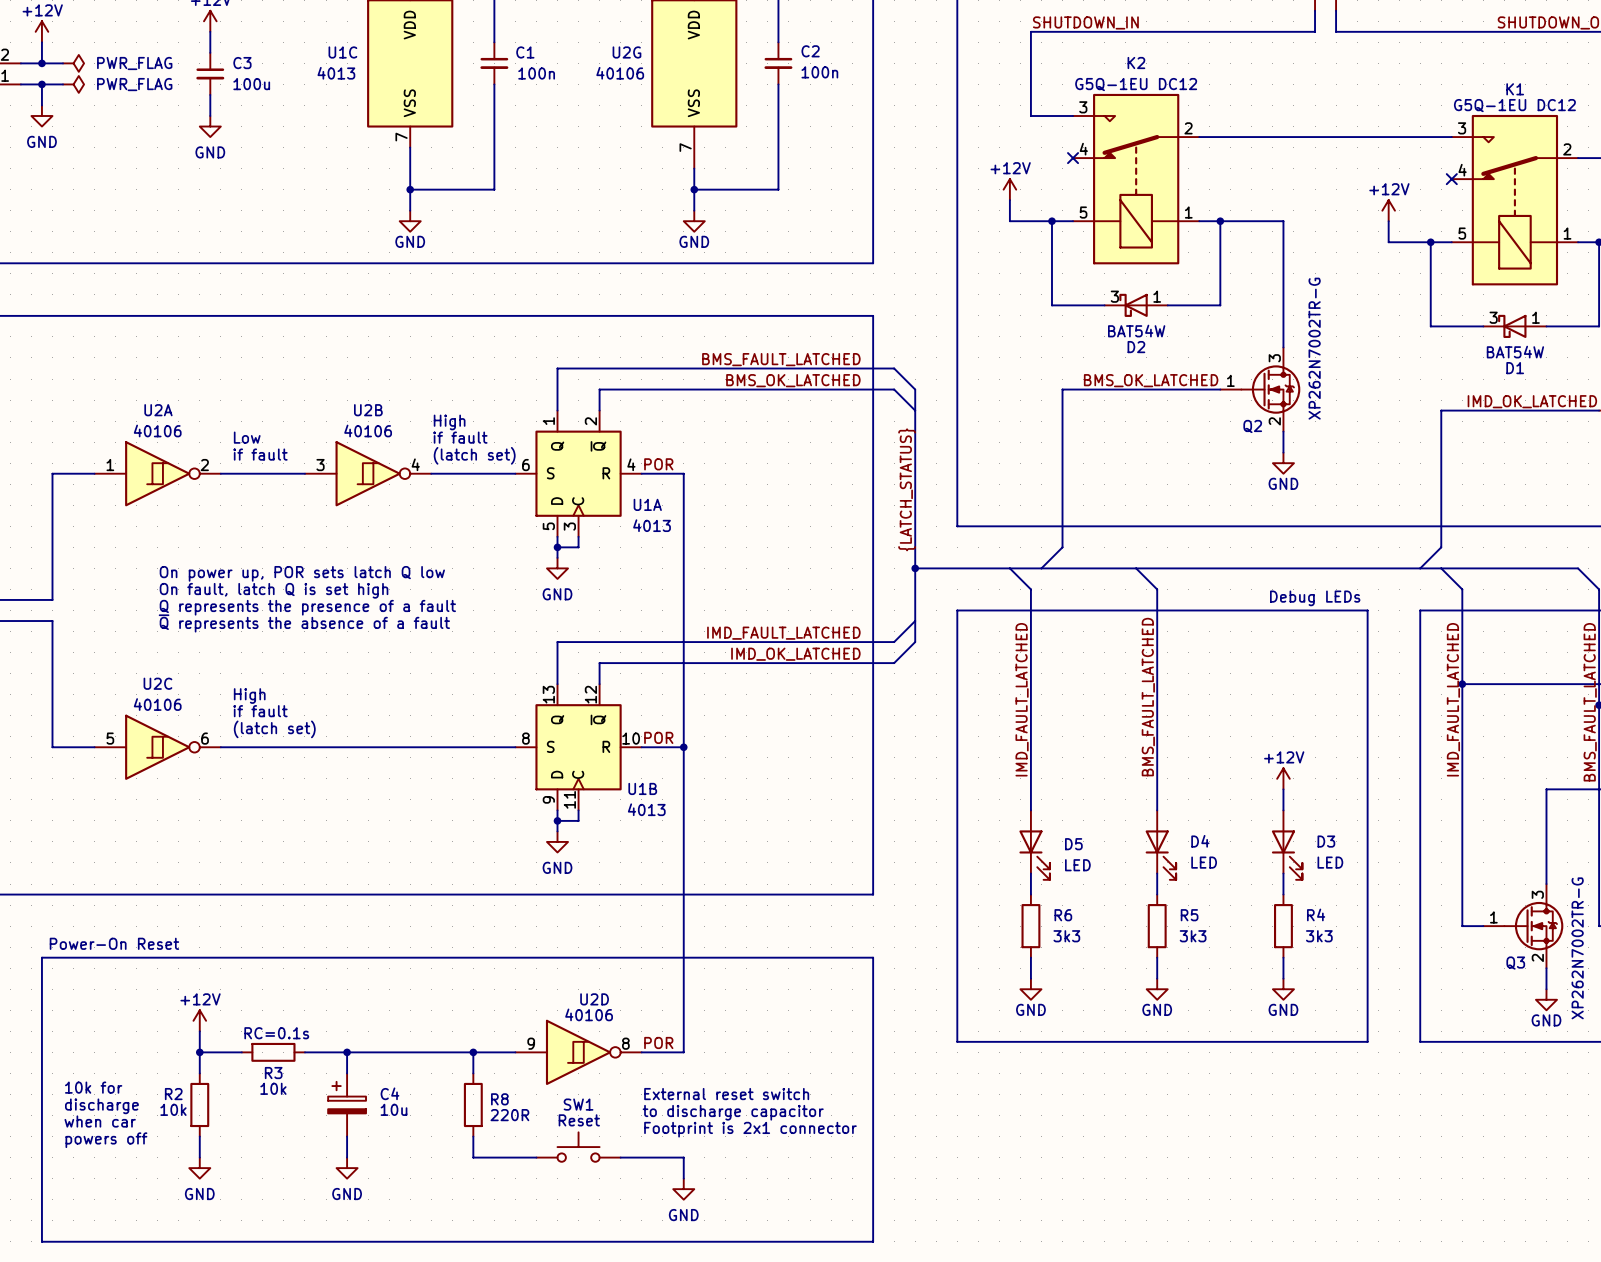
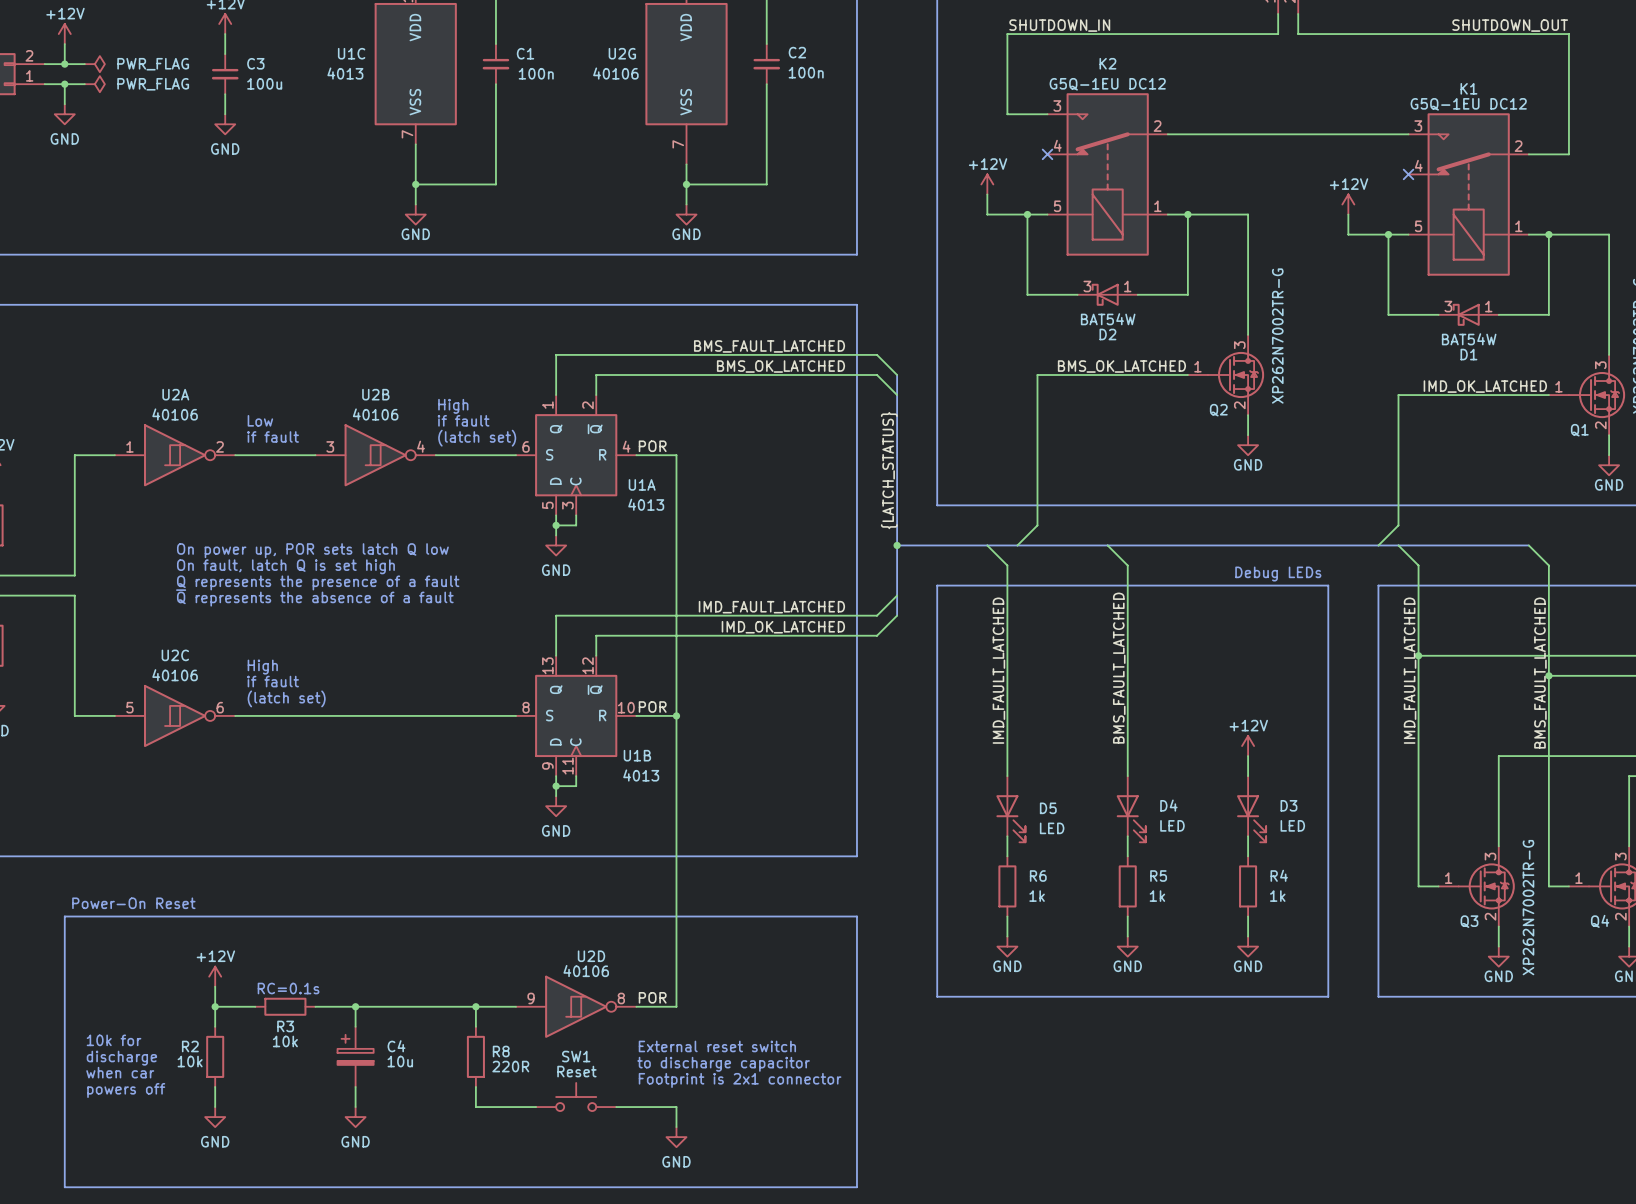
R6 value: 3k3 (1066, 936) -> 1k (1037, 896)
R5 value: 3k3 (1193, 936) -> 1k (1157, 896)
R4 value: 3k3 (1319, 936) -> 1k (1277, 896)

